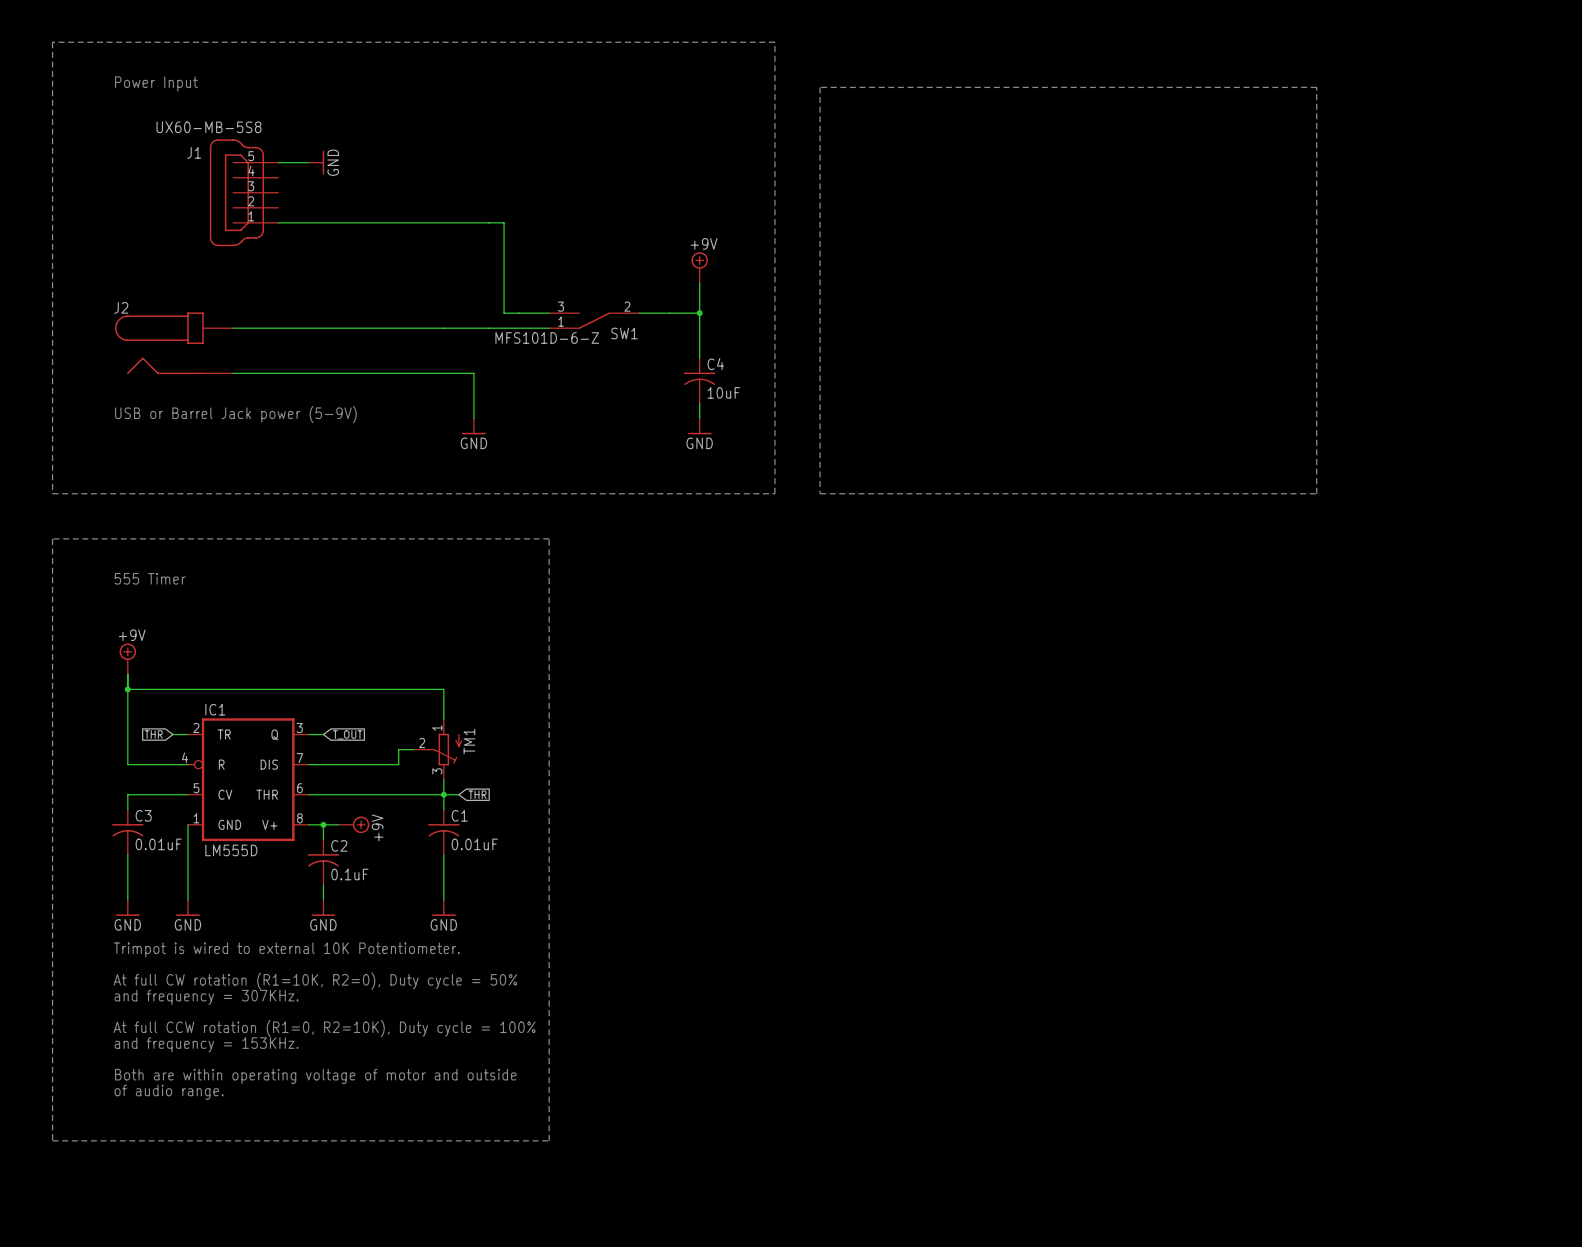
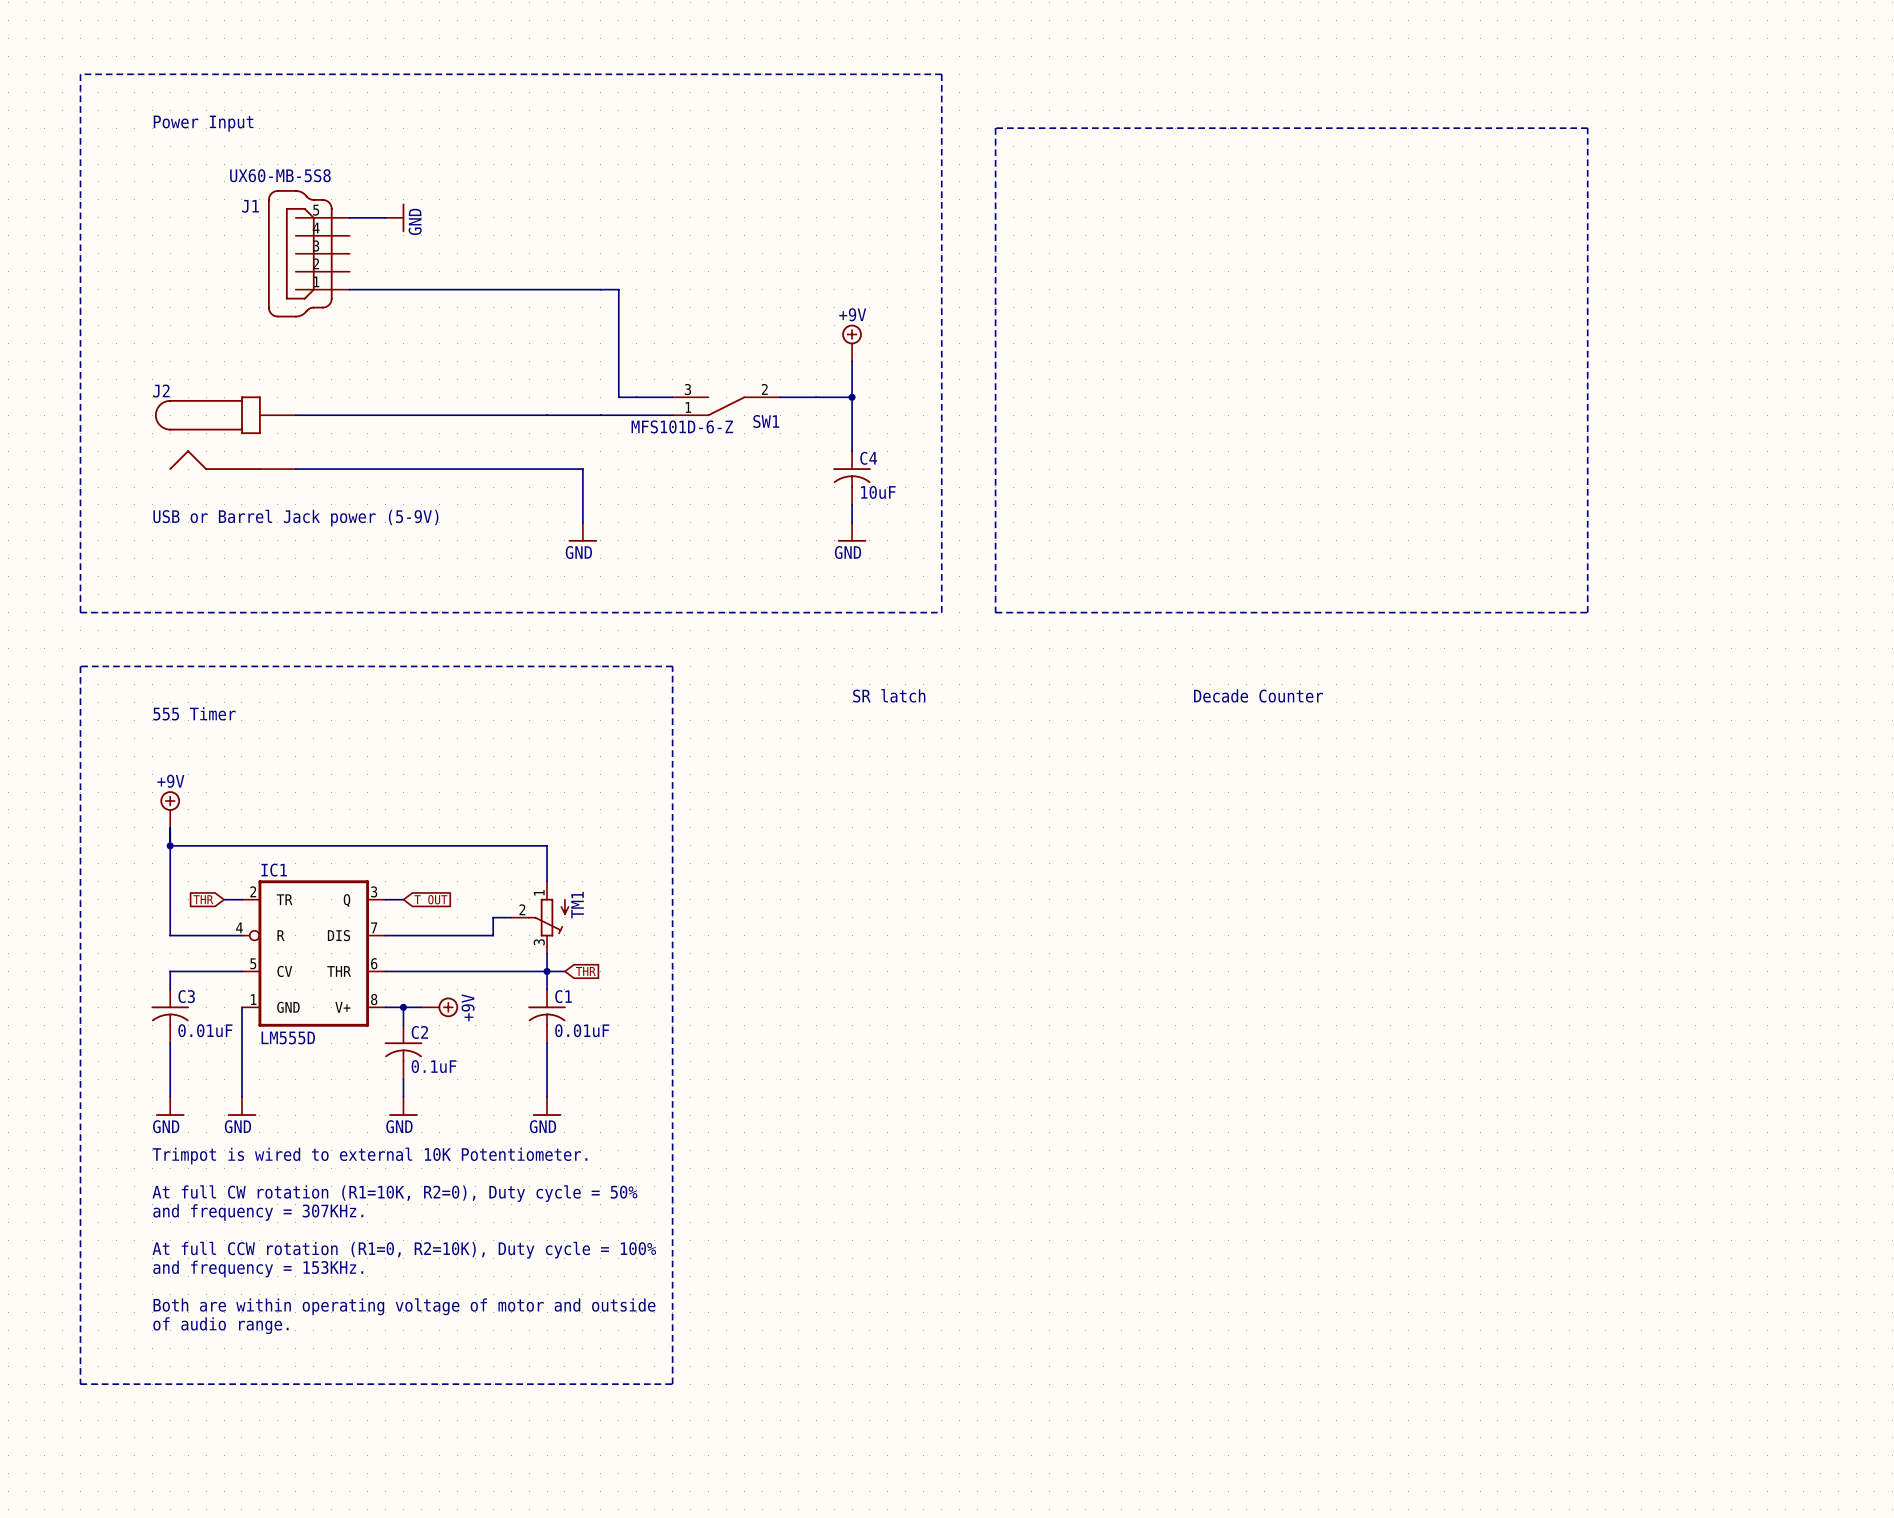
text: none -> SR latch (889, 695)
text: none -> Decade Counter (1258, 695)

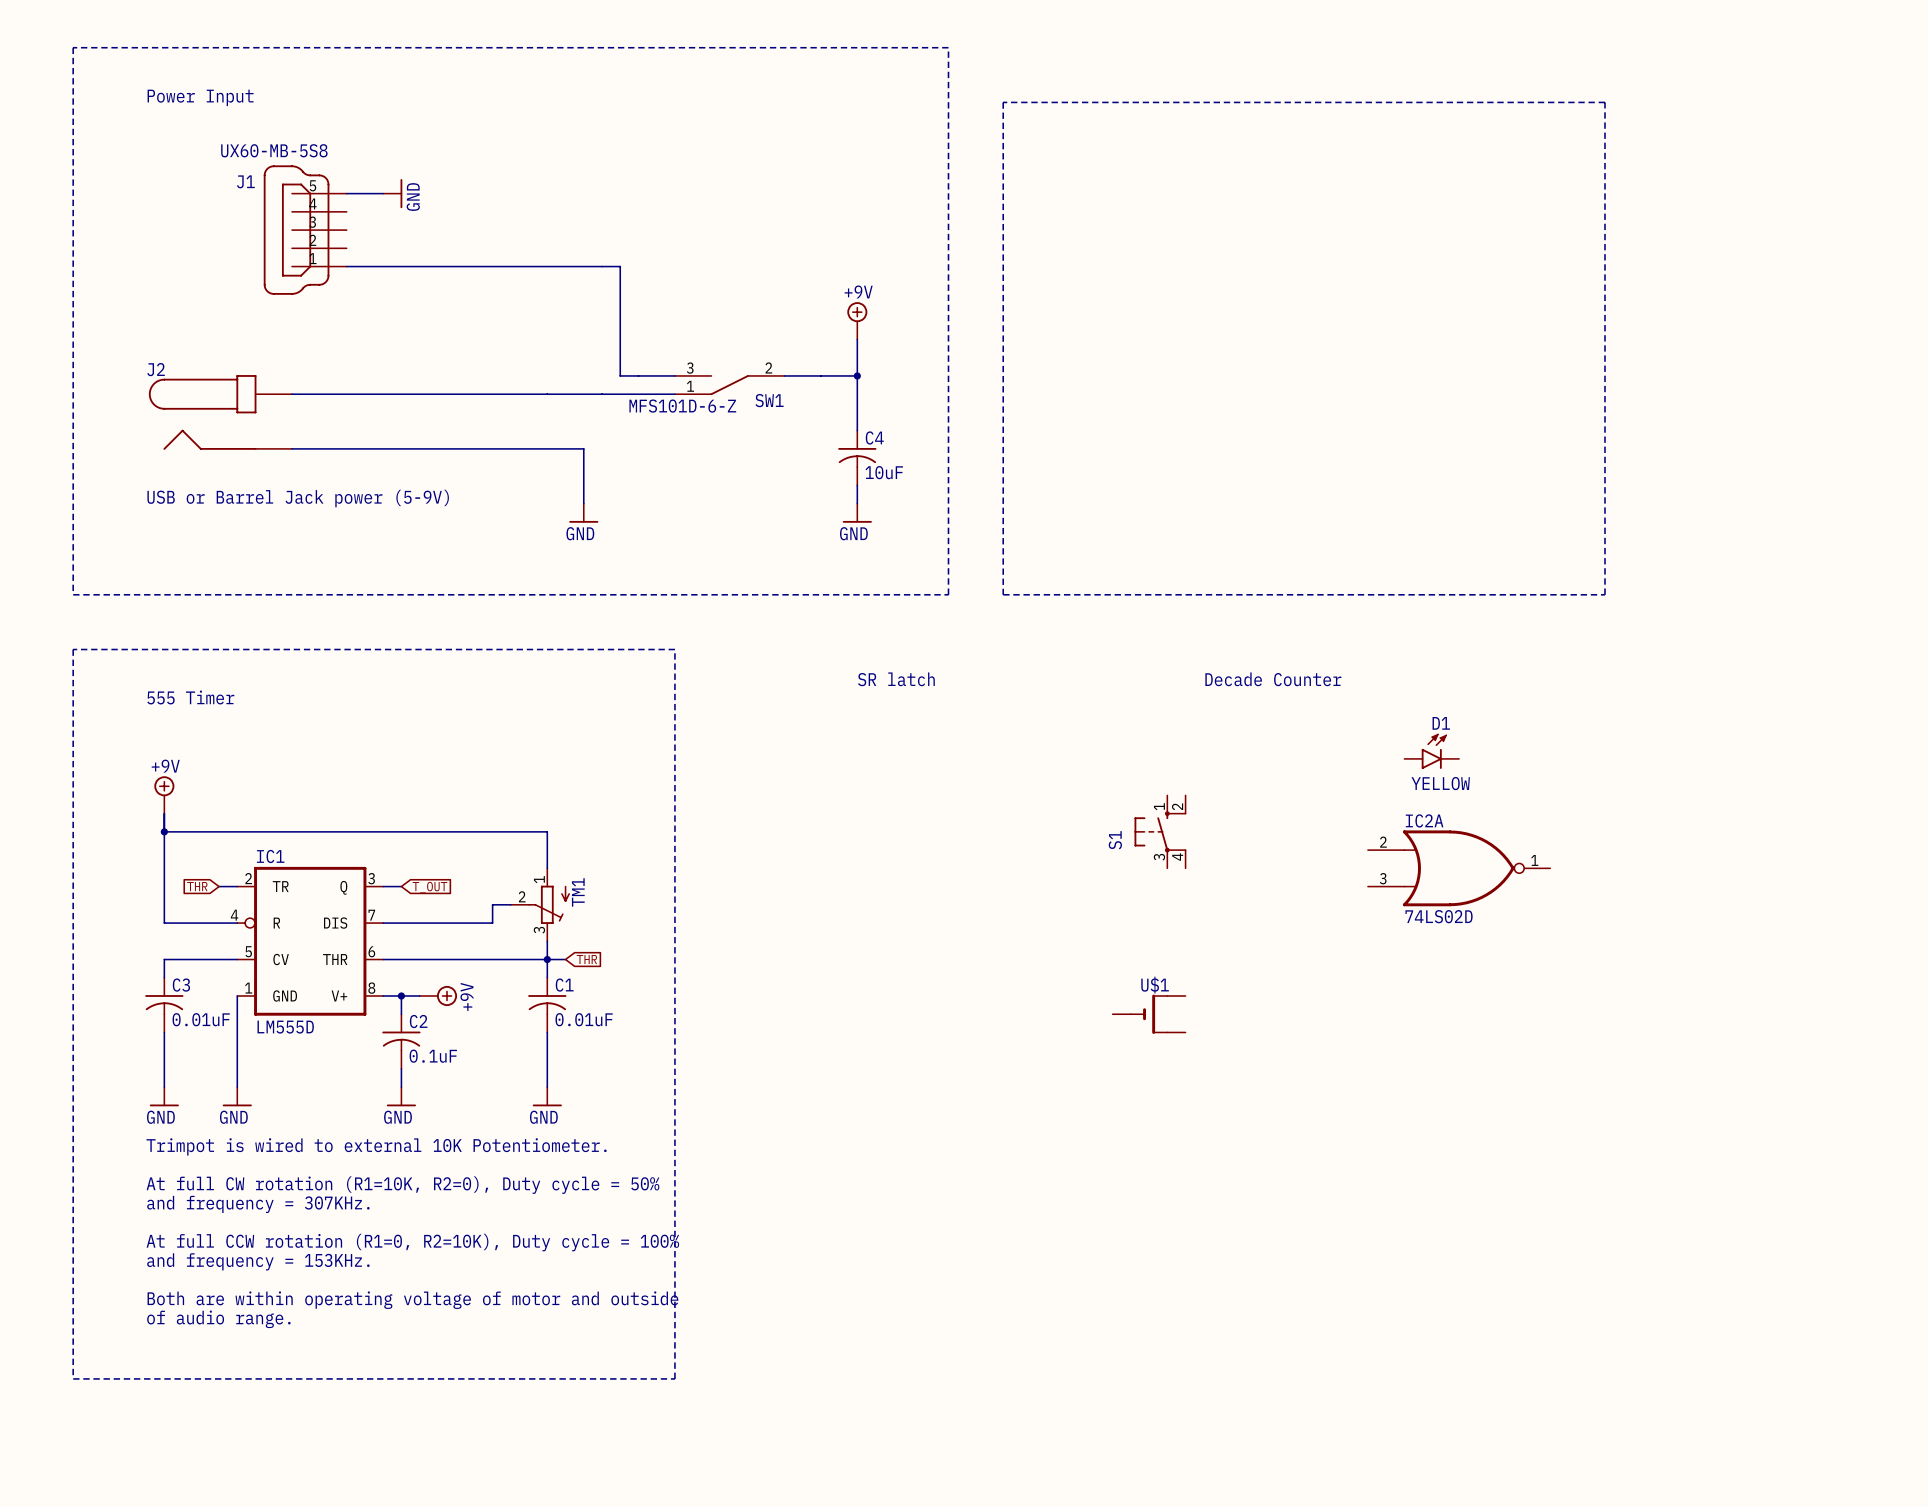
D1: none -> YELLOW (1431, 751)
S1: none -> (1160, 831)
IC2A: none -> 74LS02D (1459, 868)
U$1: none -> (1149, 1014)

